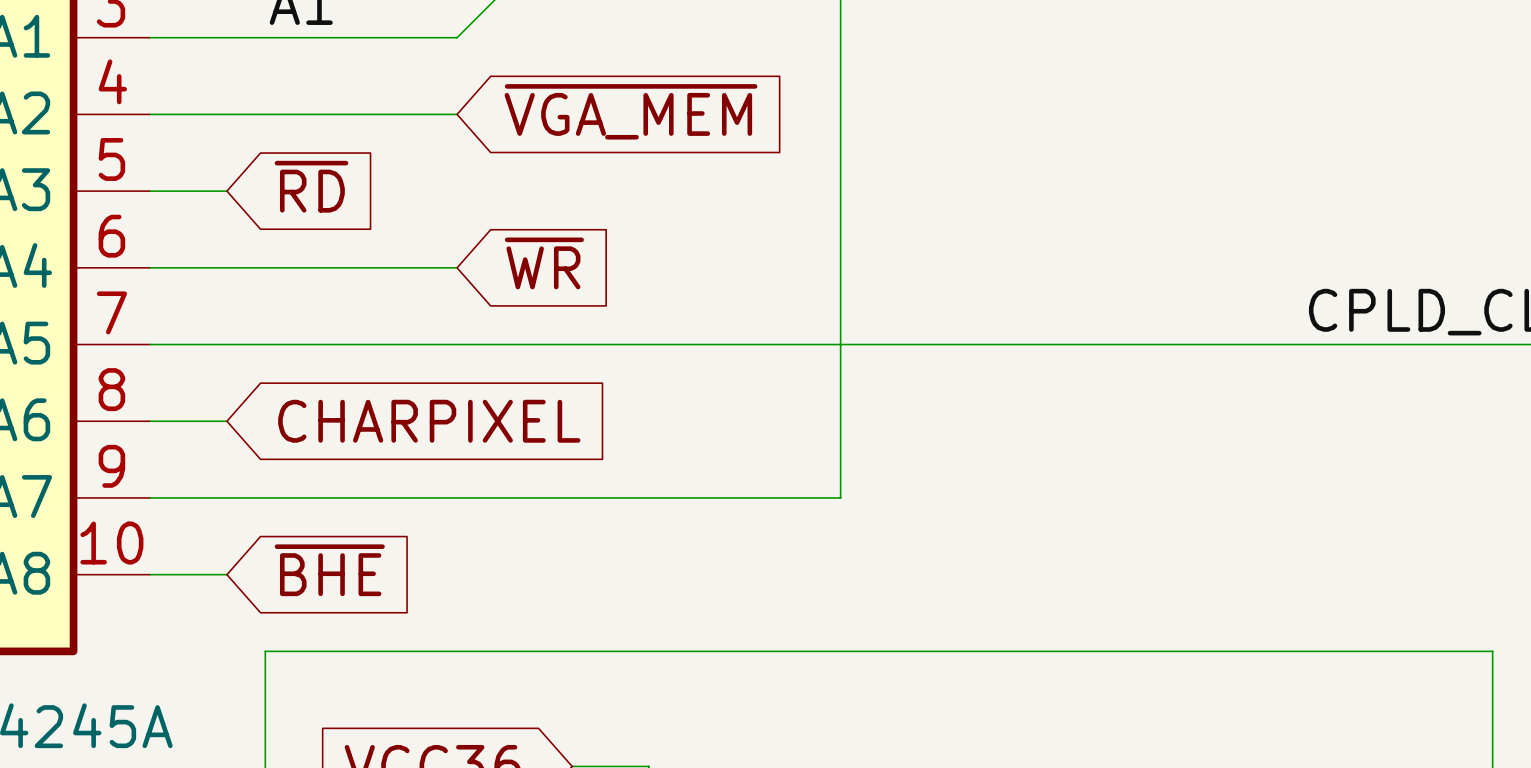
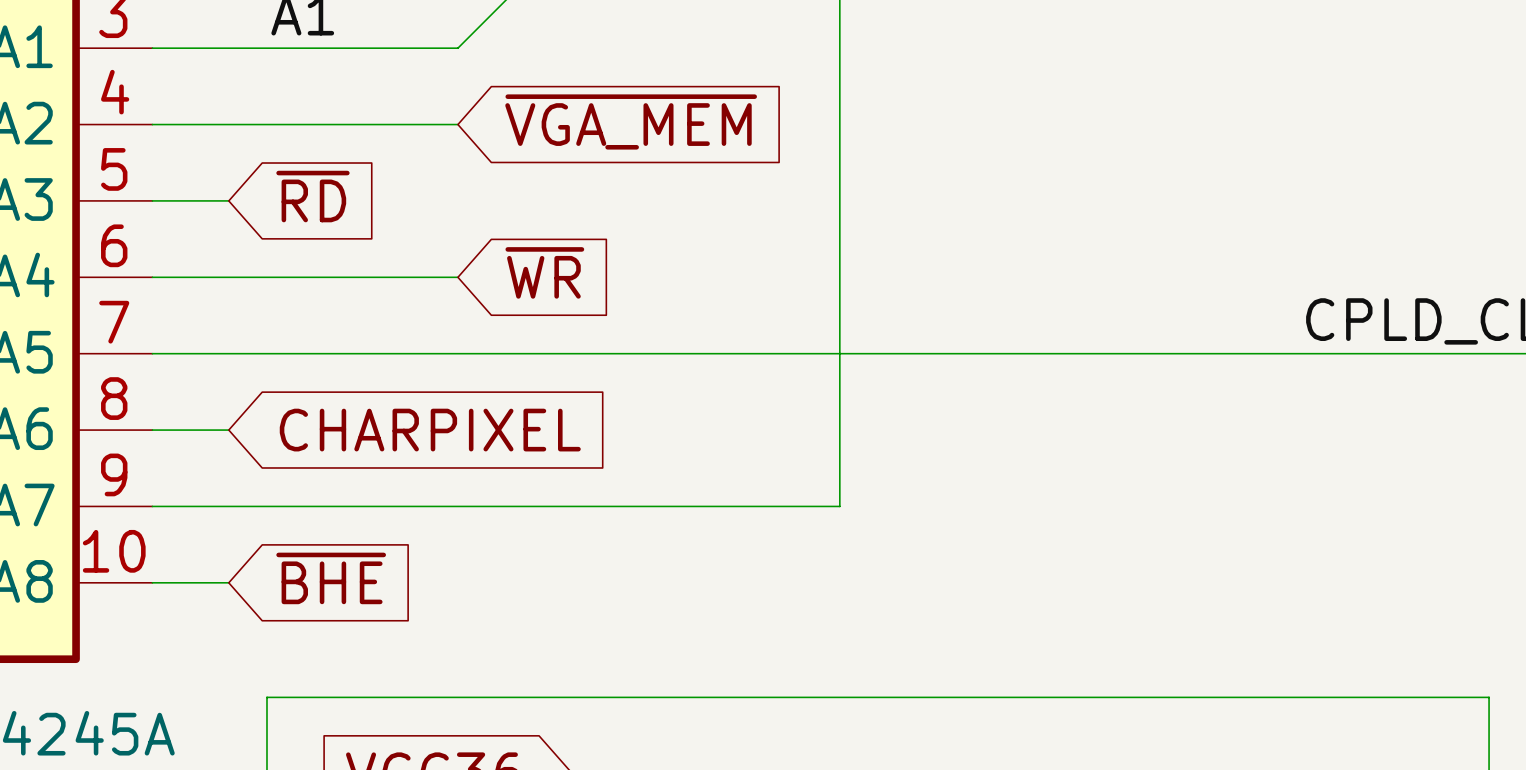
wire: (265, 689) (265, 651) (1492, 651) (1492, 689) -> (266, 697) (1489, 697)

